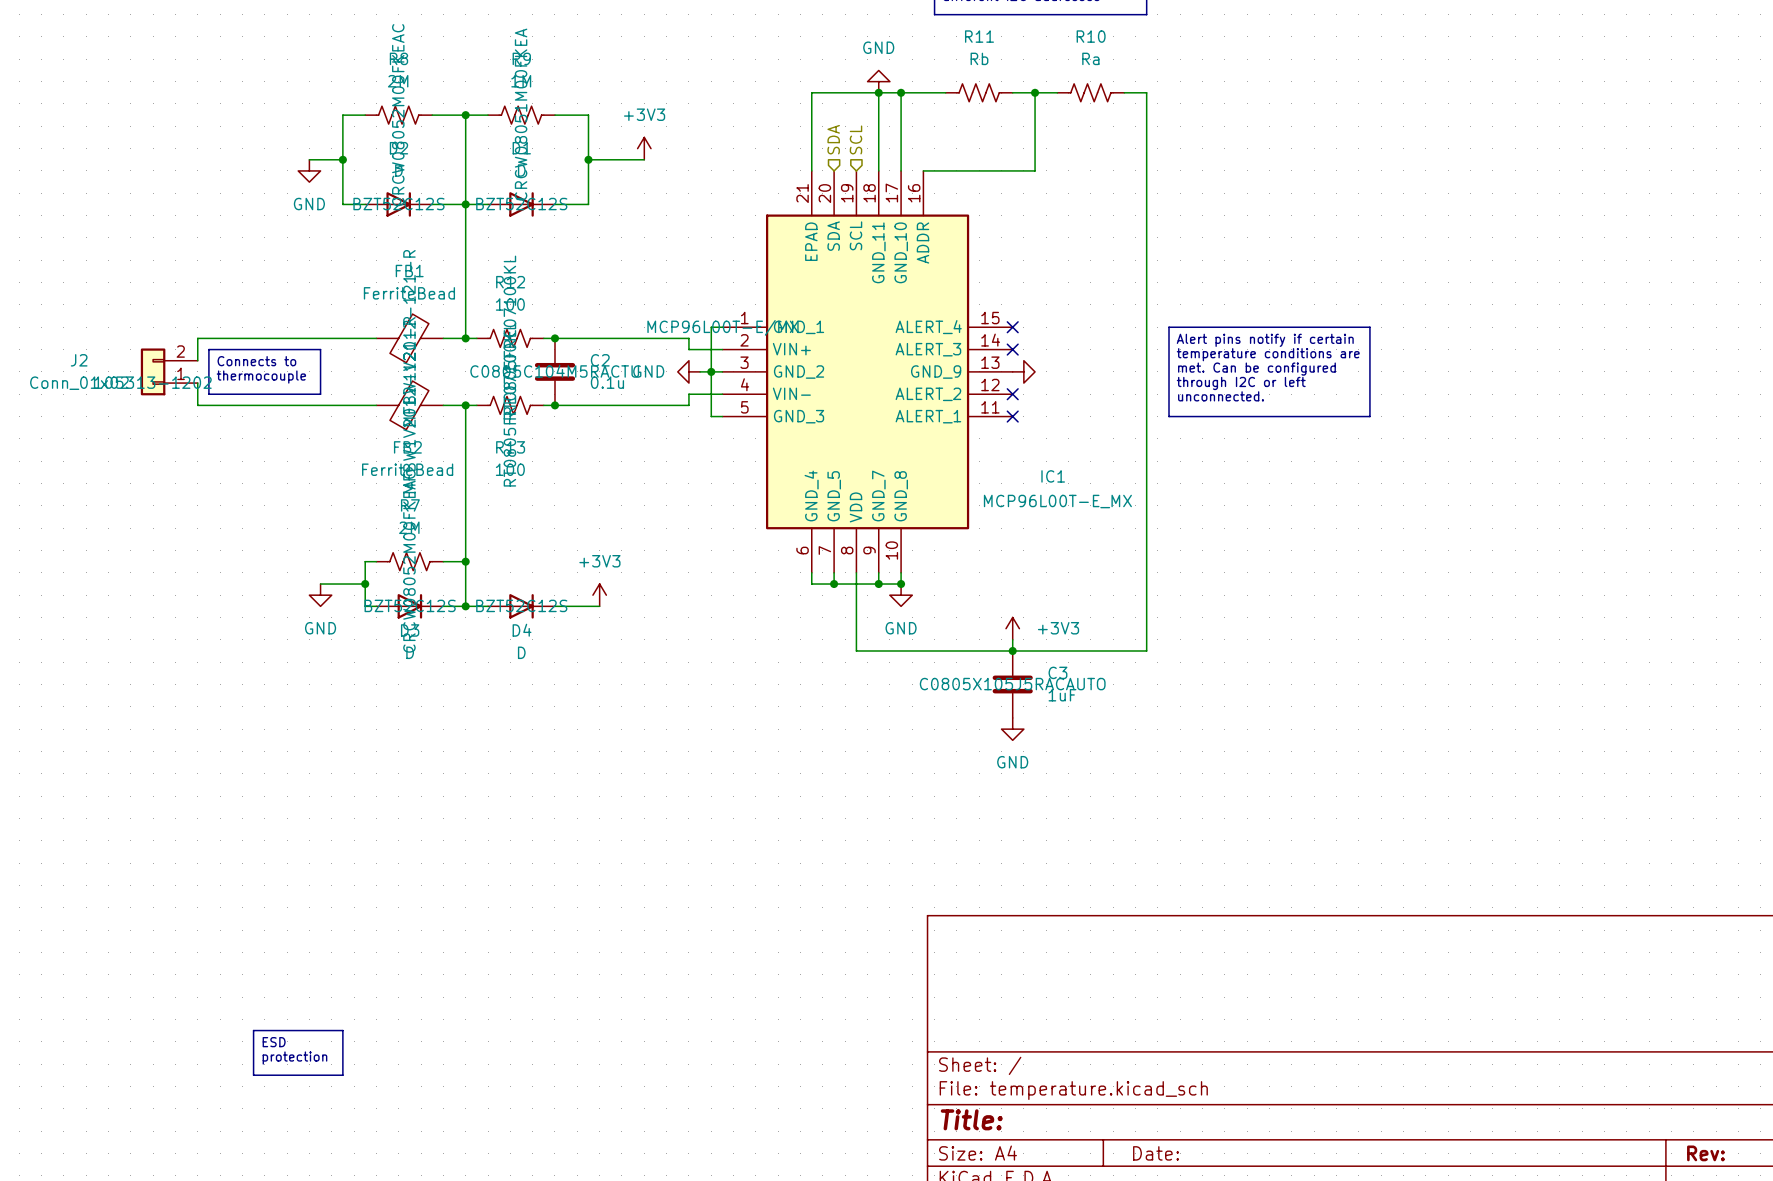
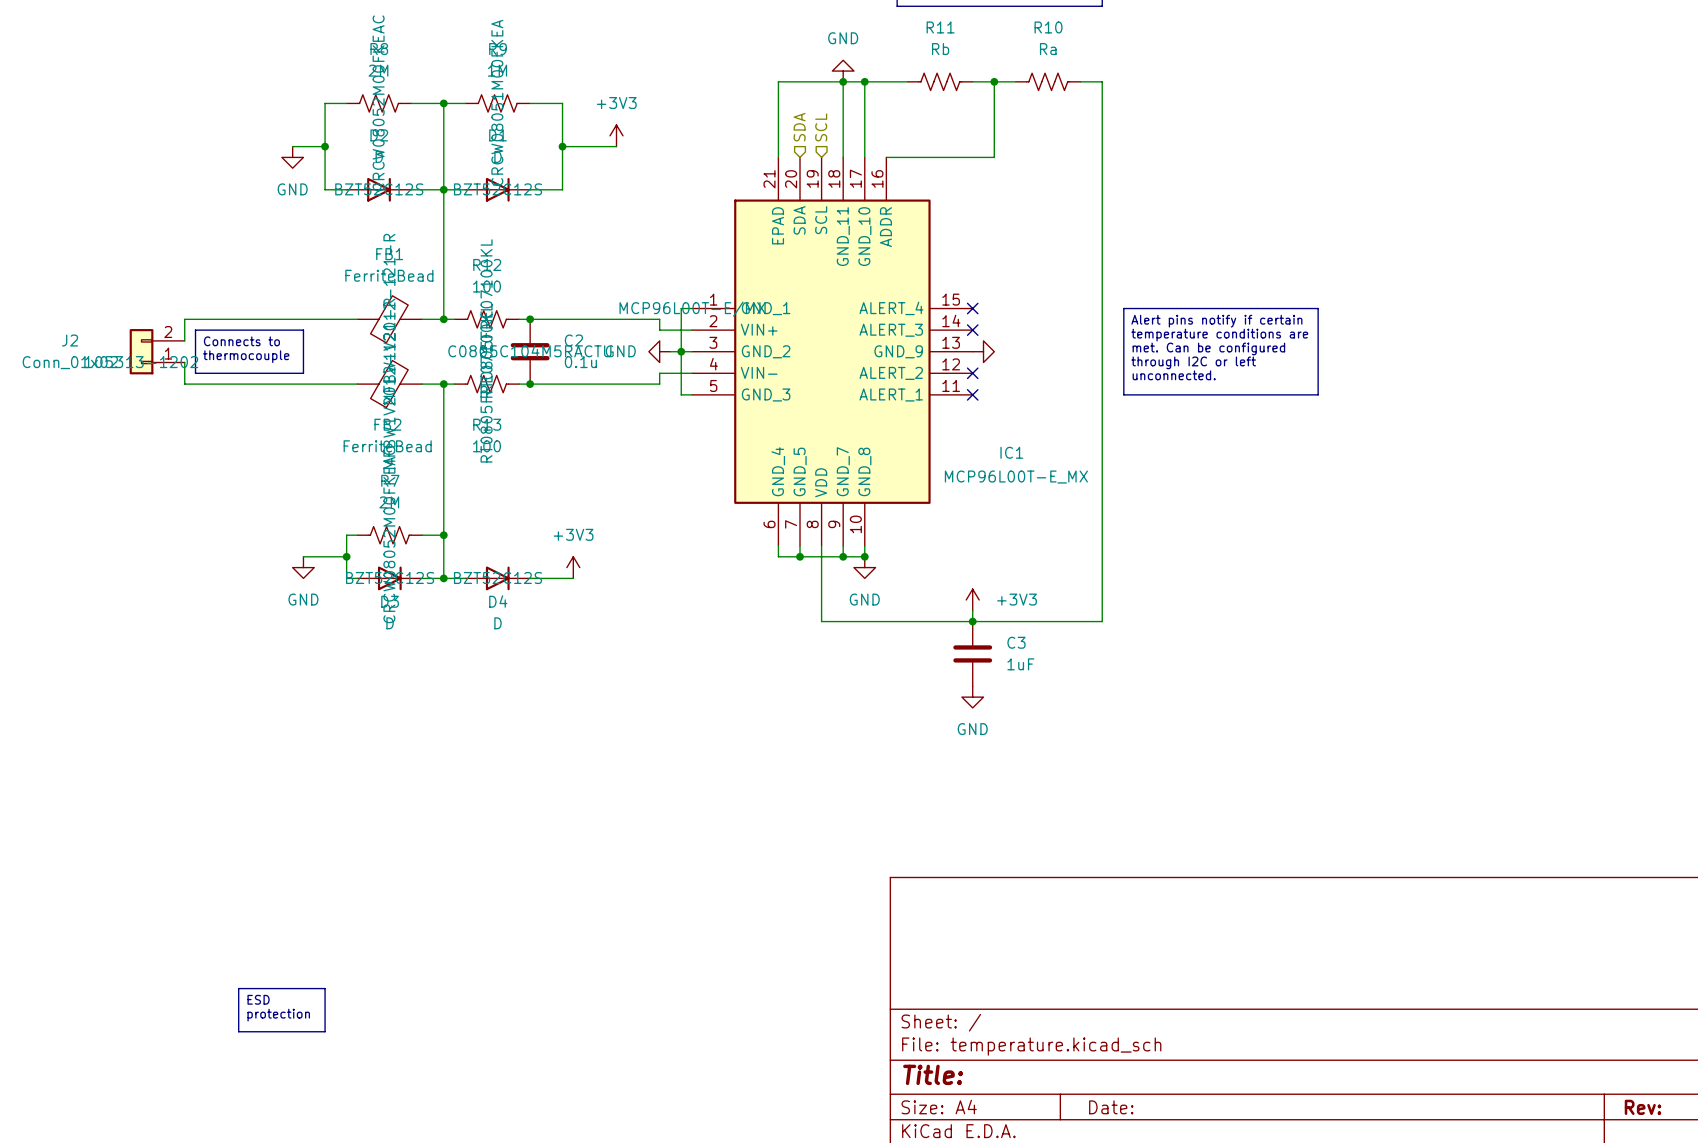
C3 text: C0805X105J5RACAUTO (1012, 684) -> none

